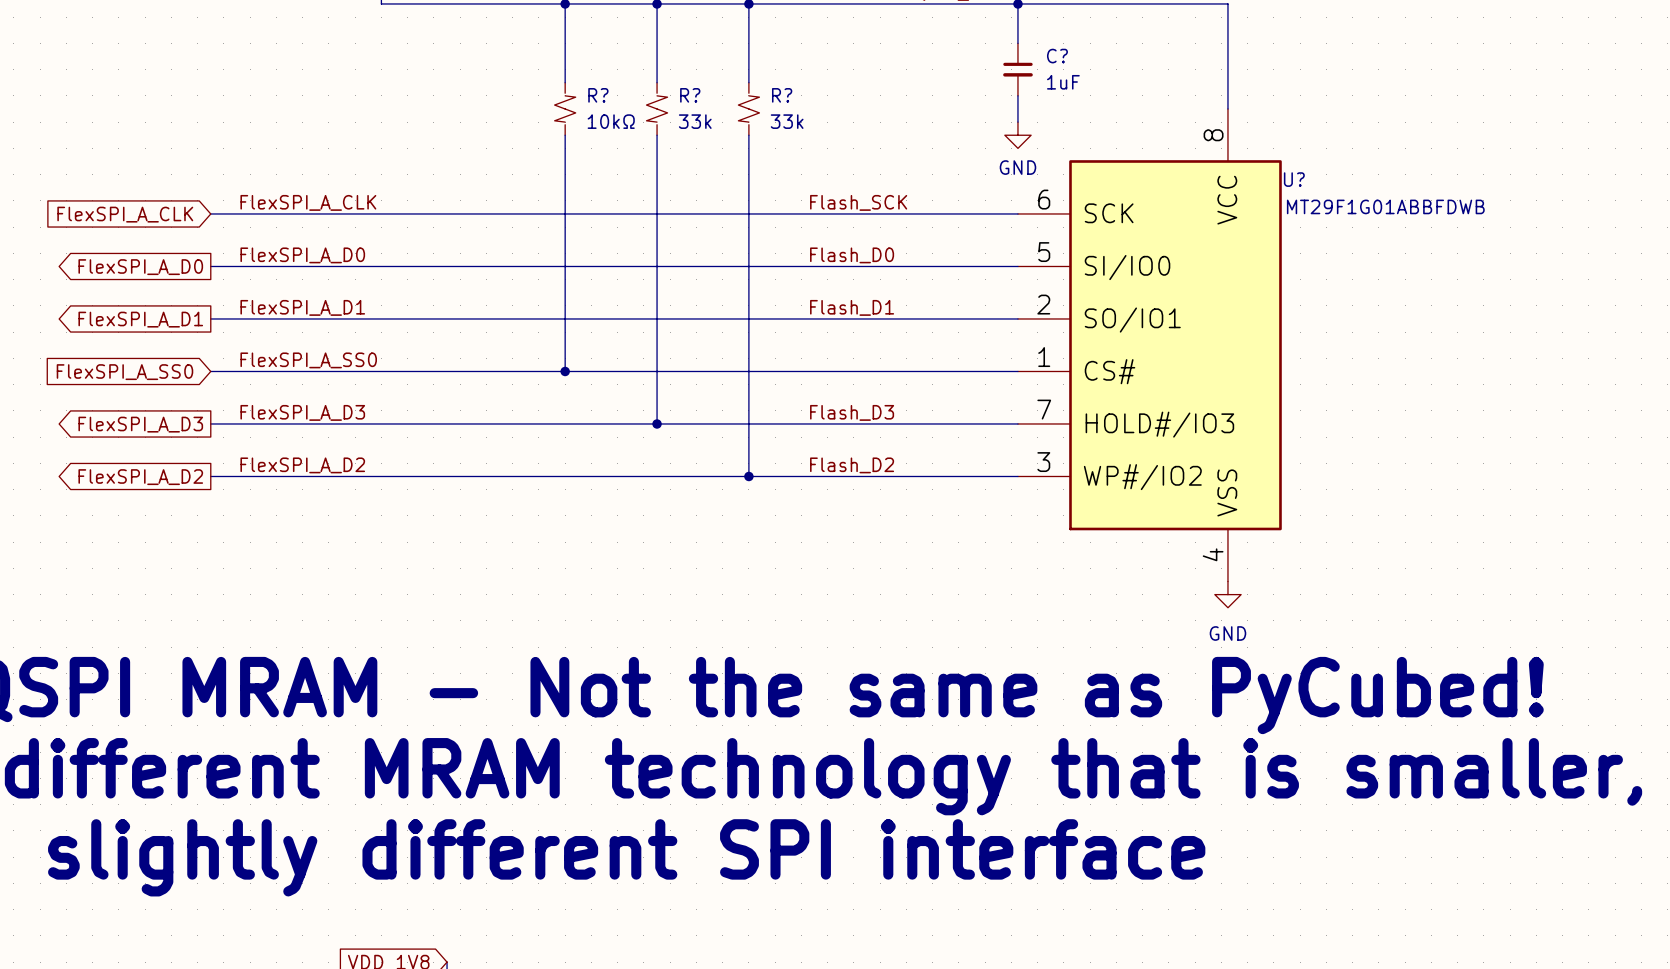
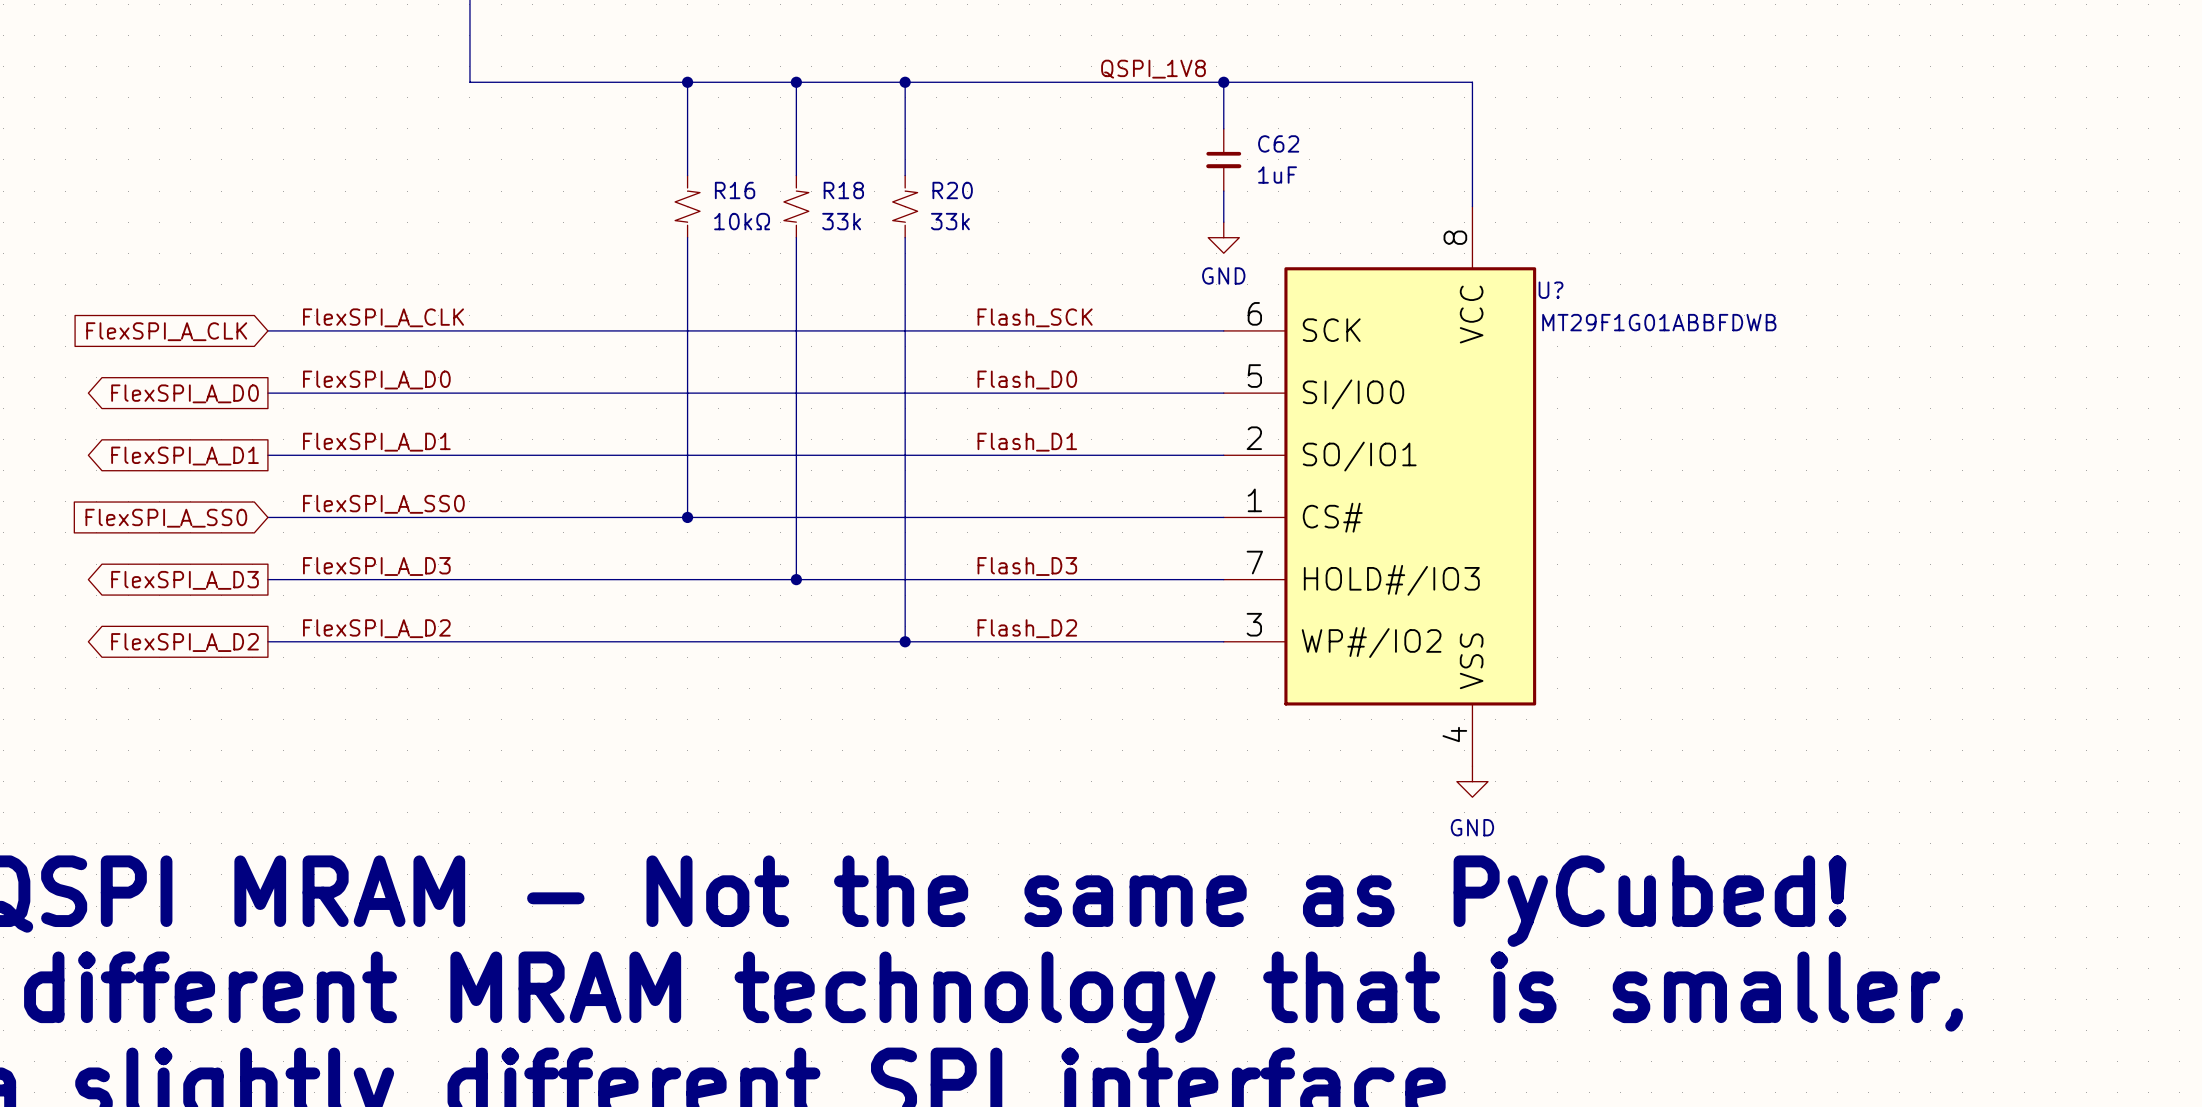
C? name: C? (1057, 56) -> C62 (1278, 143)
R? name: R? (598, 95) -> R16 (735, 190)
R? name: R? (690, 95) -> R18 (843, 190)
R? name: R? (782, 95) -> R20 (952, 190)

